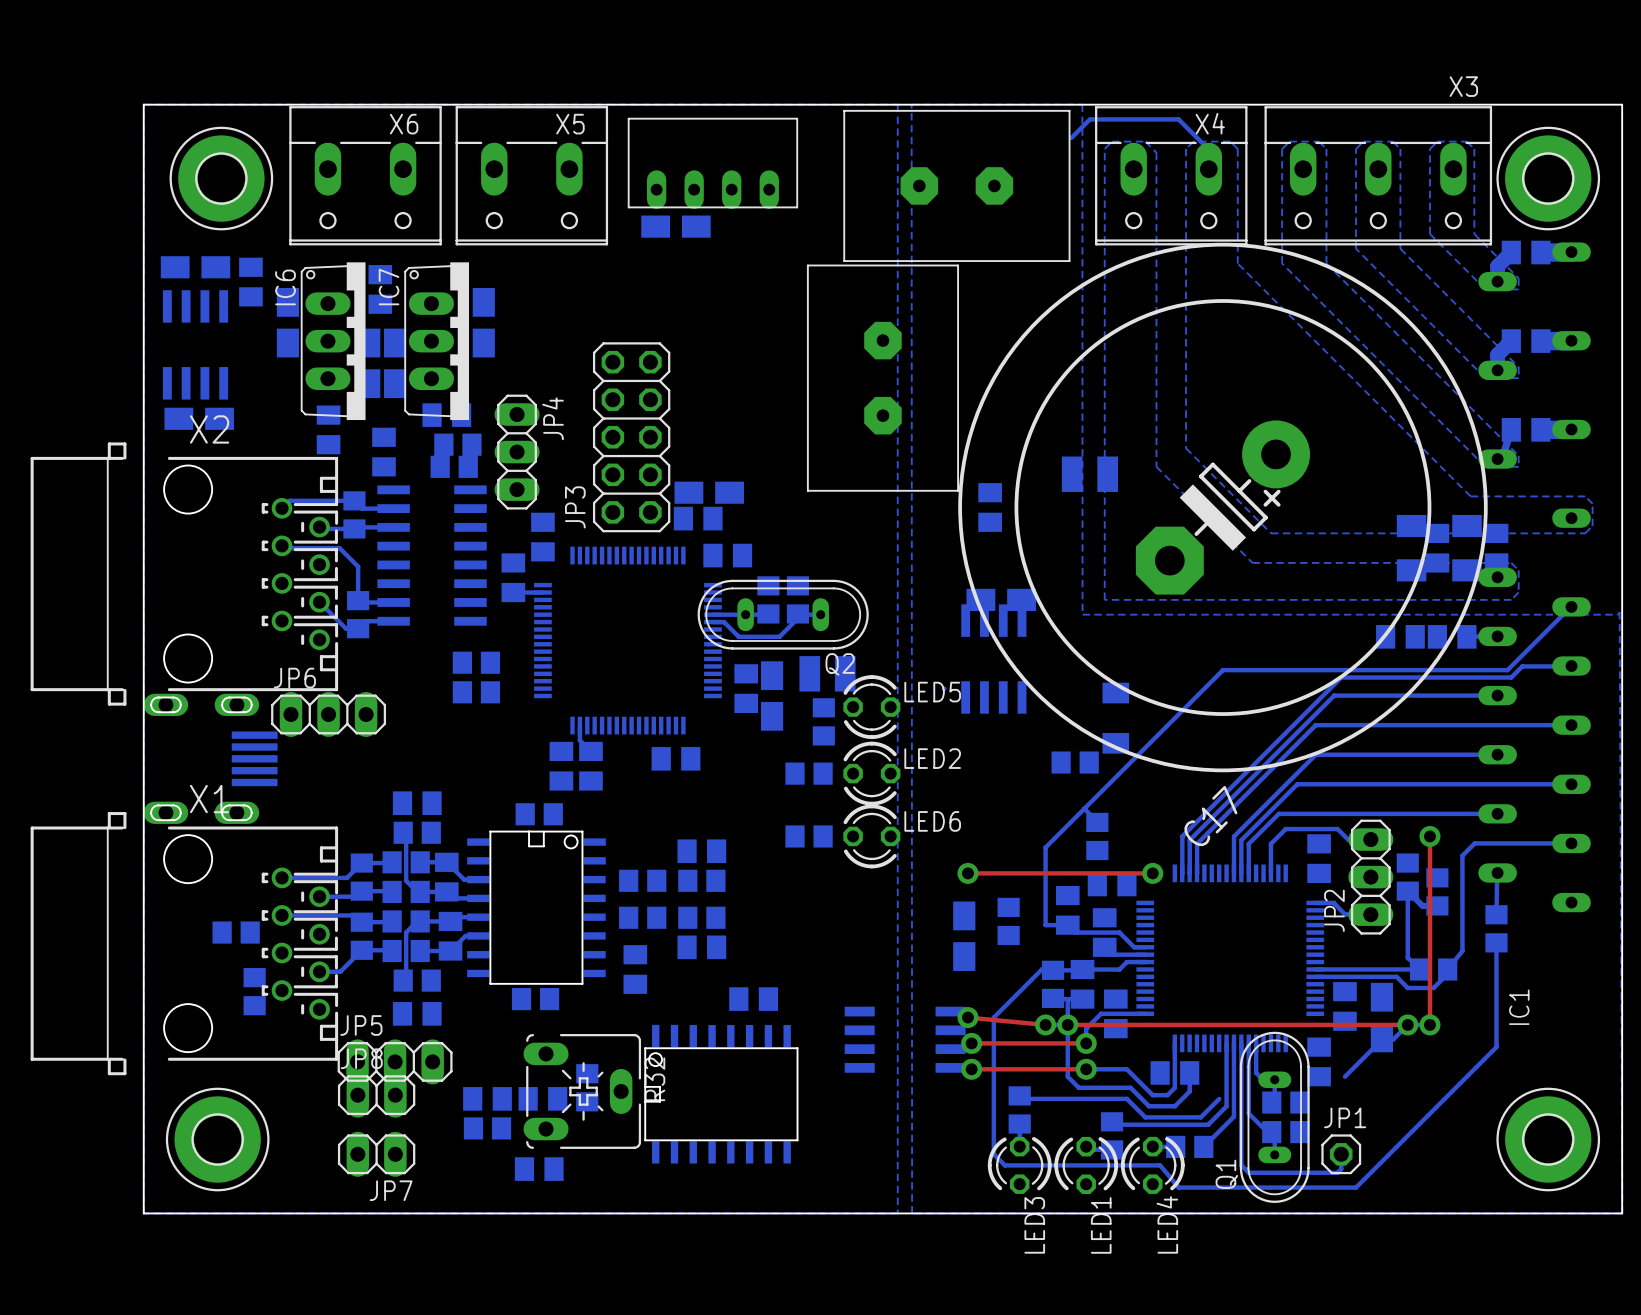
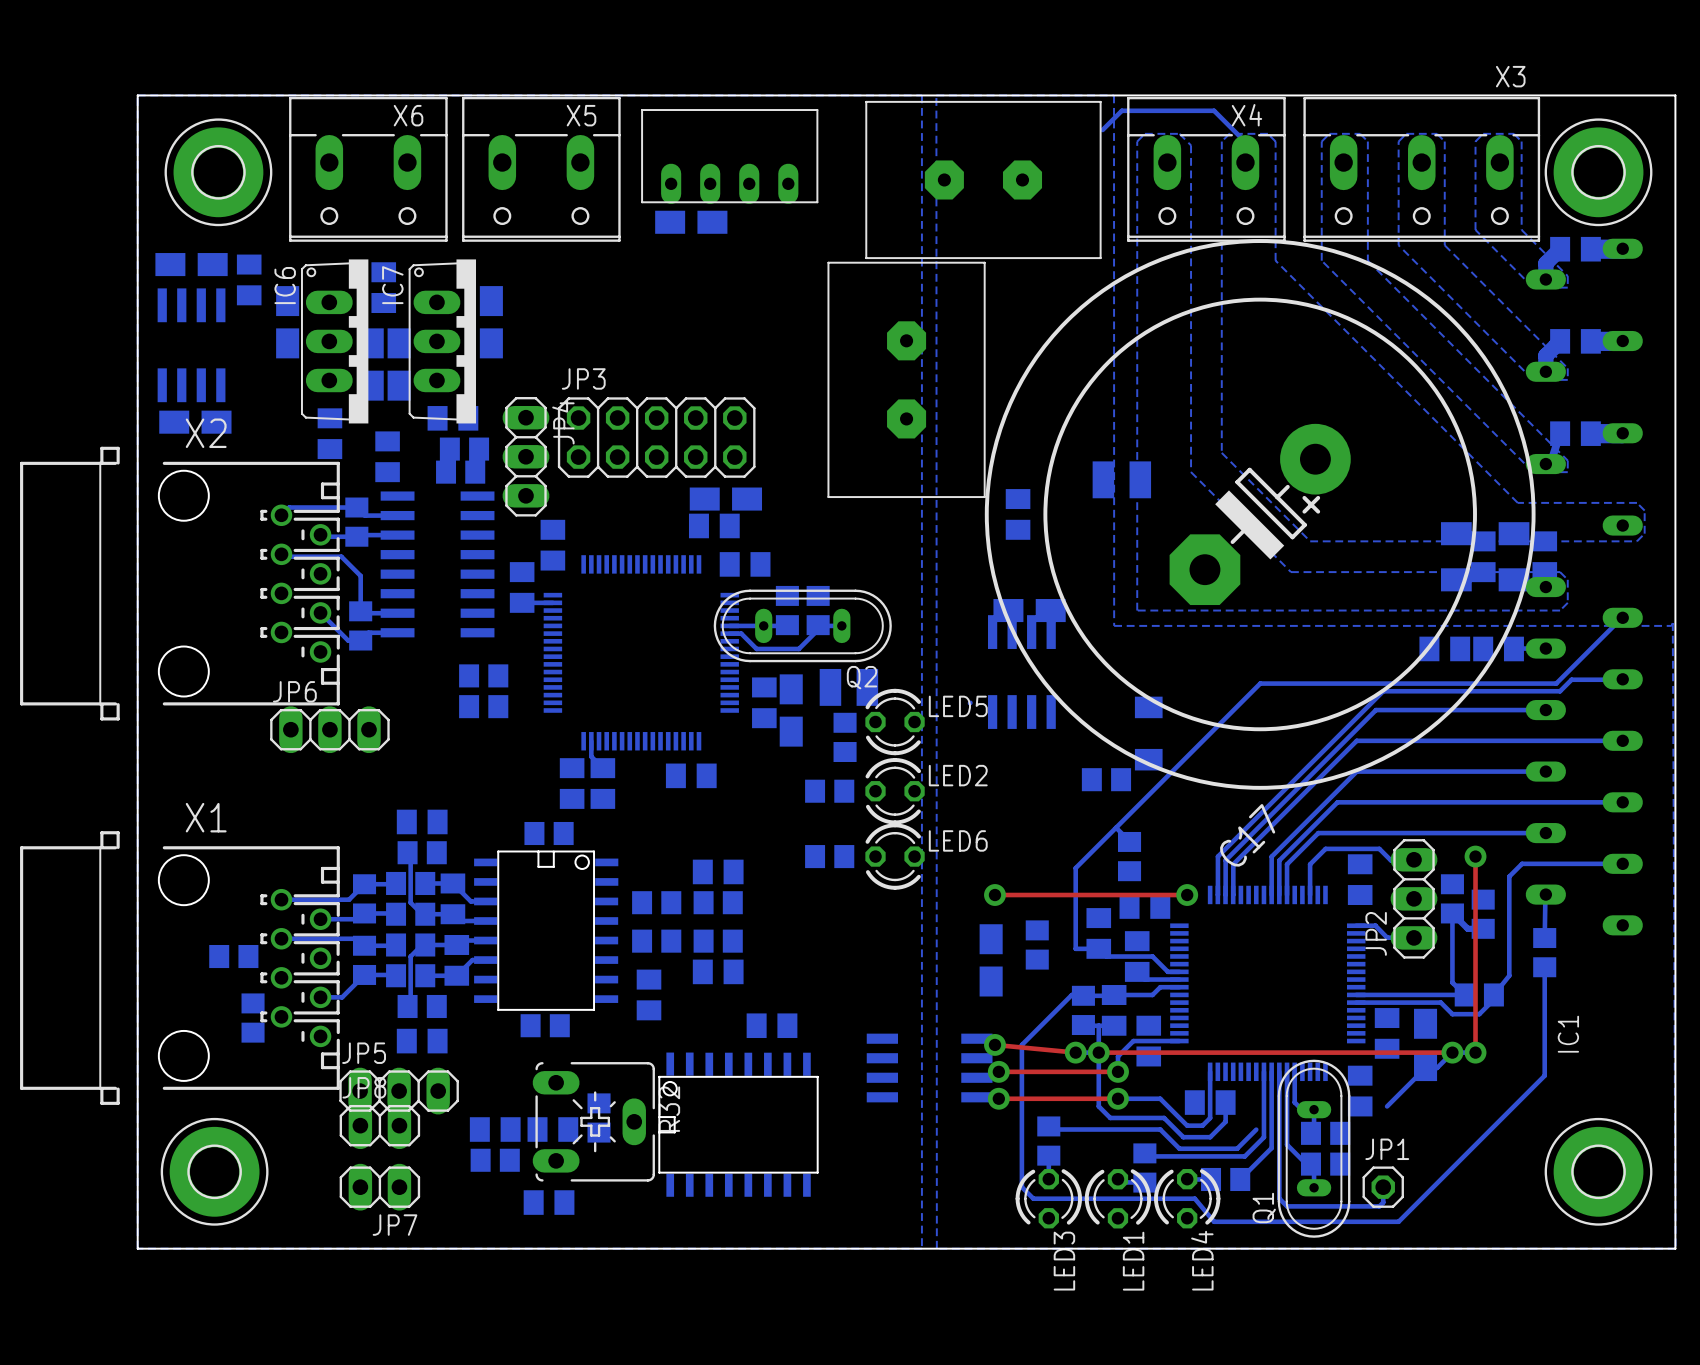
JP3 rotation: 0° (631, 437) -> 90° clockwise (656, 437)
part: (210, 758) -> none

